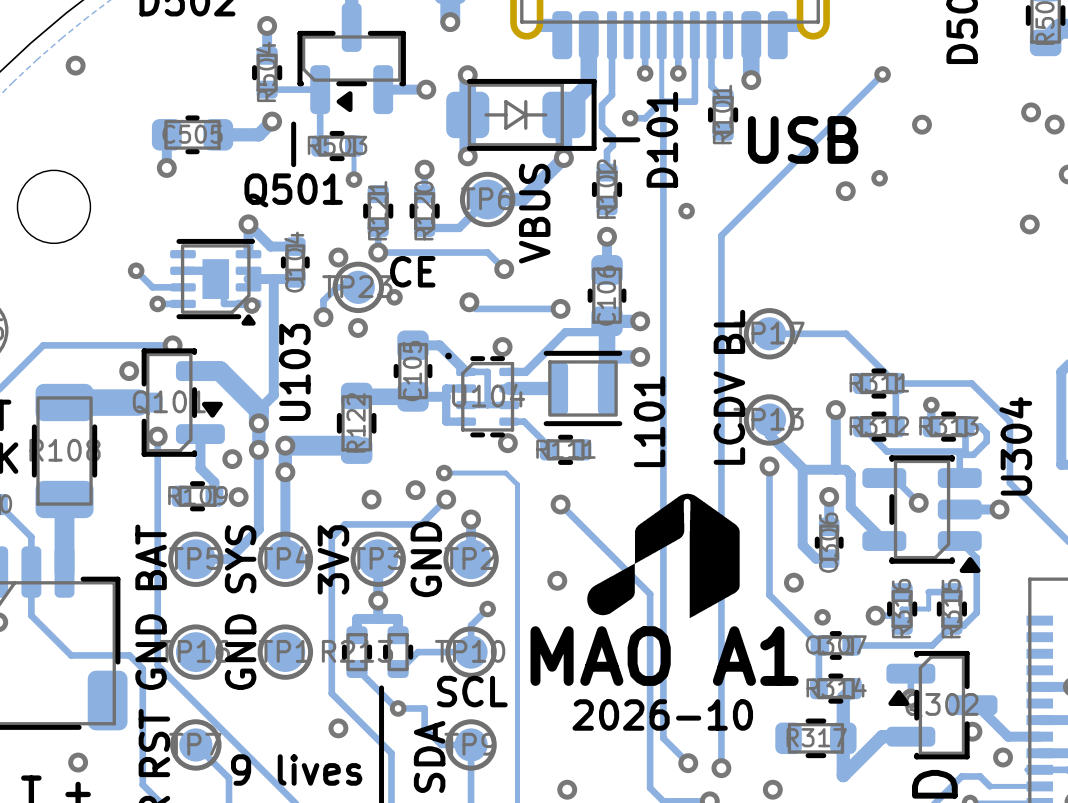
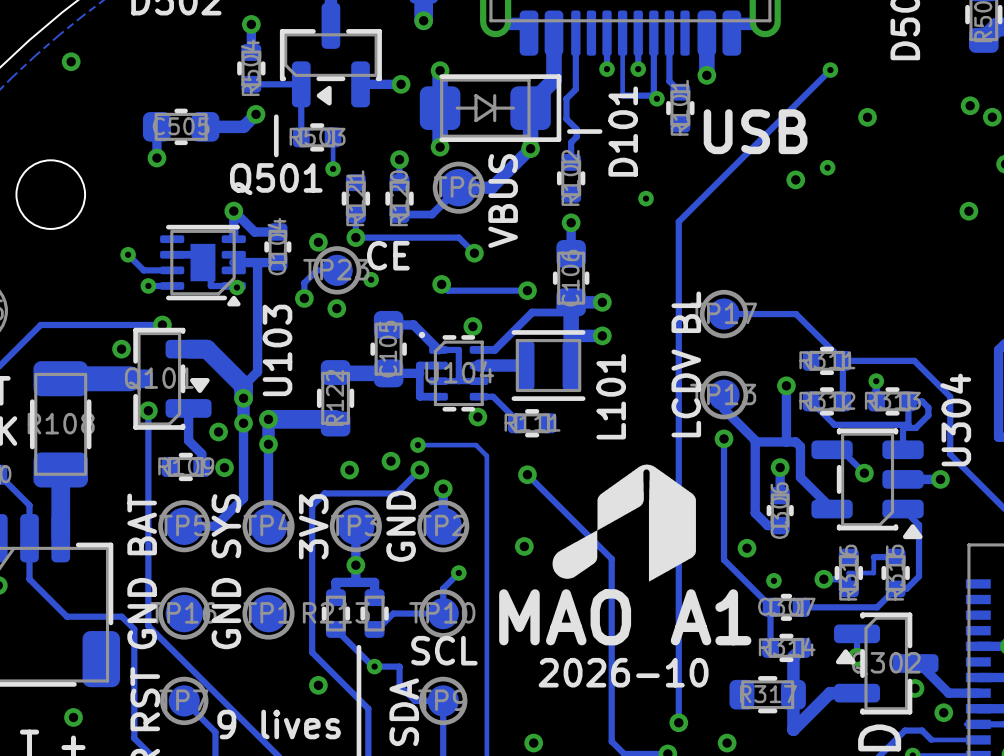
track: (661, 101) (645, 118) (630, 118) -> none
track: (663, 101) (663, 738) (688, 763) -> none
via position: (630, 118) -> (656, 98)
via: (688, 763) -> none

